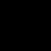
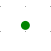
junction: none -> (25, 25)

